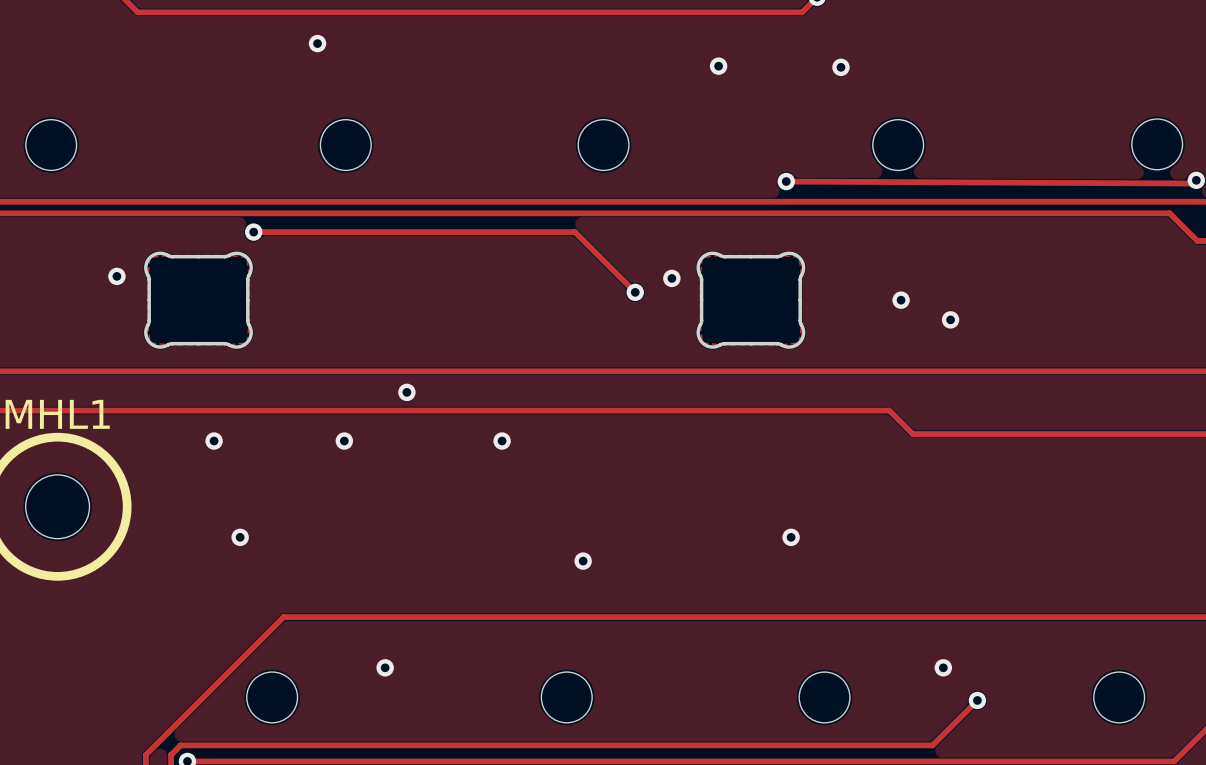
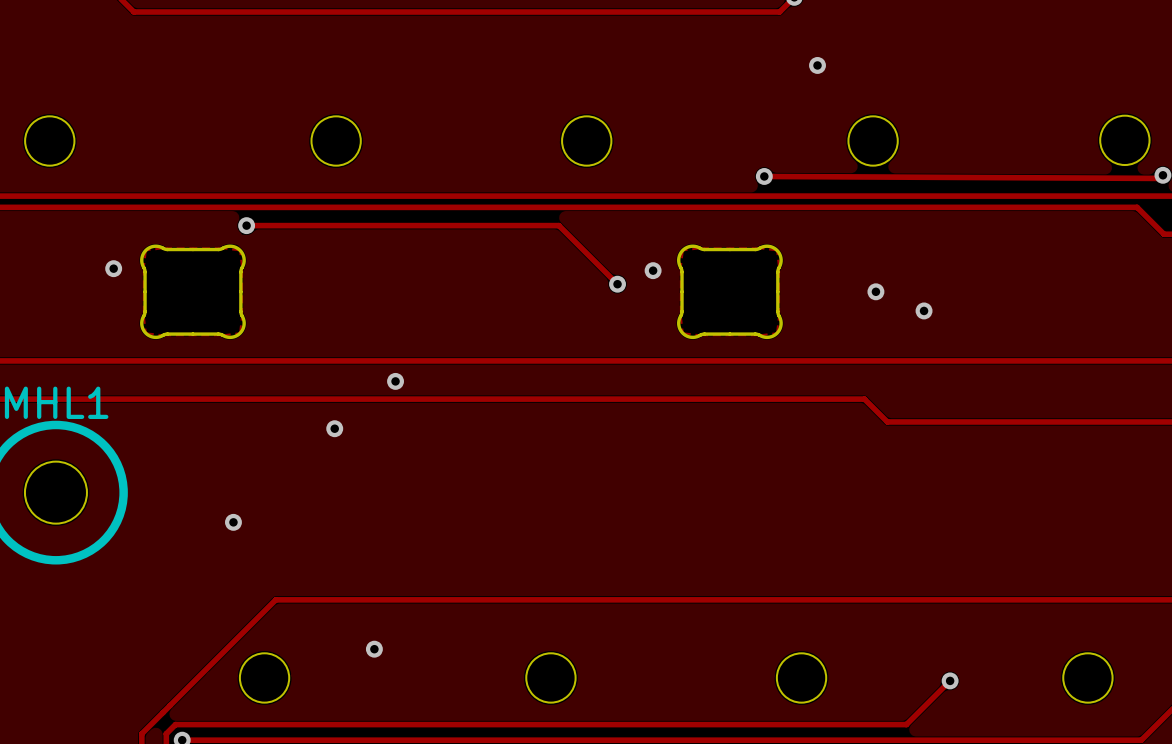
via: (317, 43) -> none
via: (718, 66) -> none
via: (214, 441) -> none
via: (502, 441) -> none
via: (791, 537) -> none
via: (583, 561) -> none
via: (943, 667) -> none

